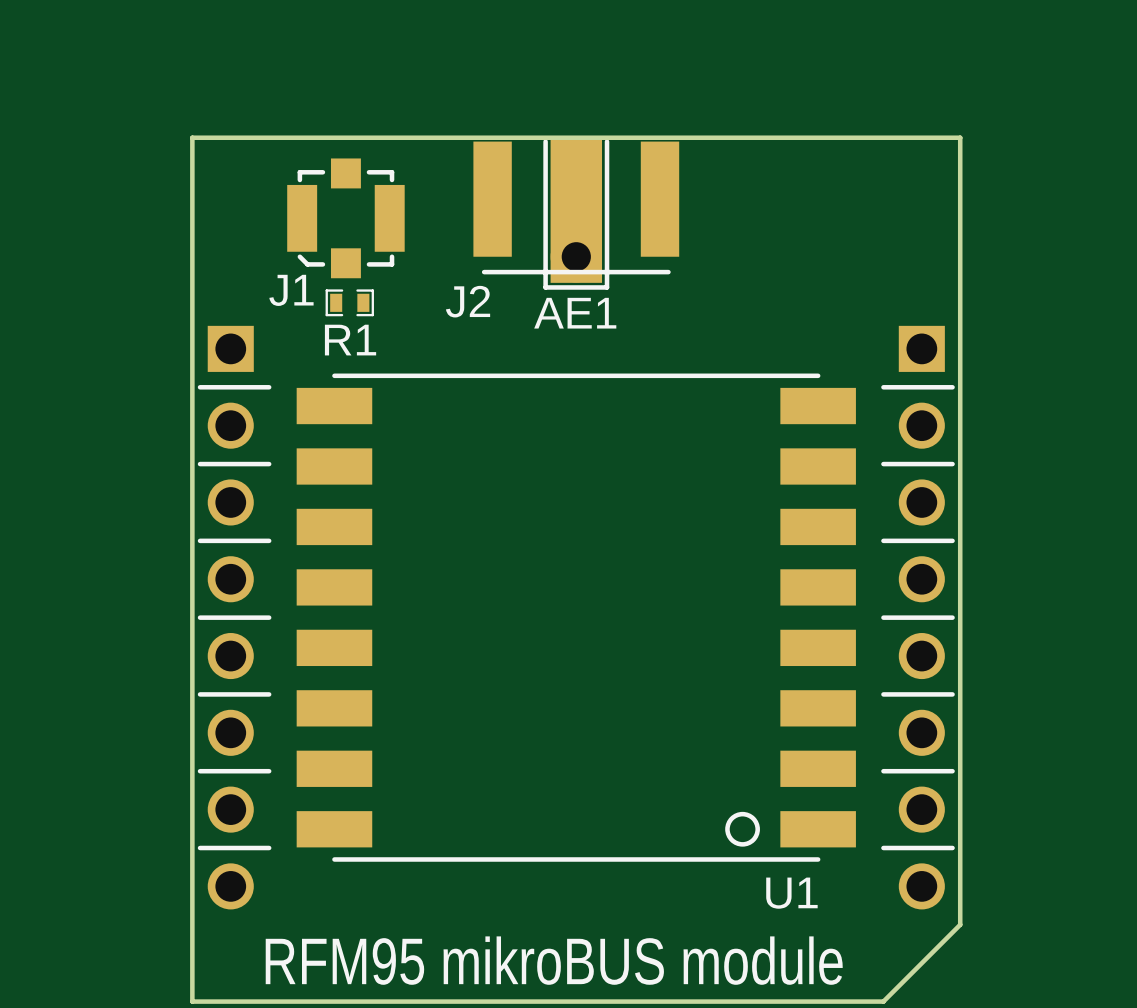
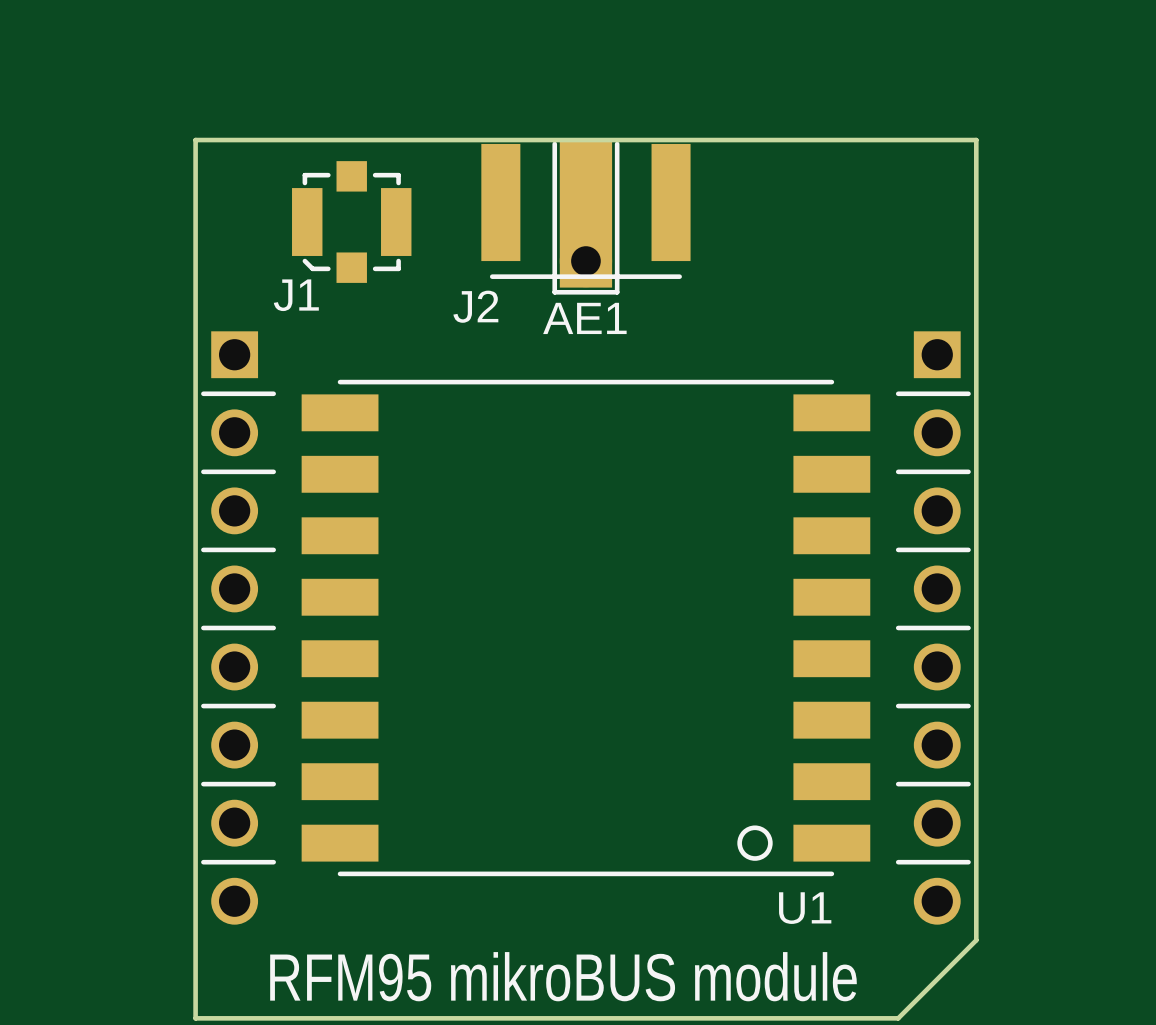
R1: (349, 302) -> none

